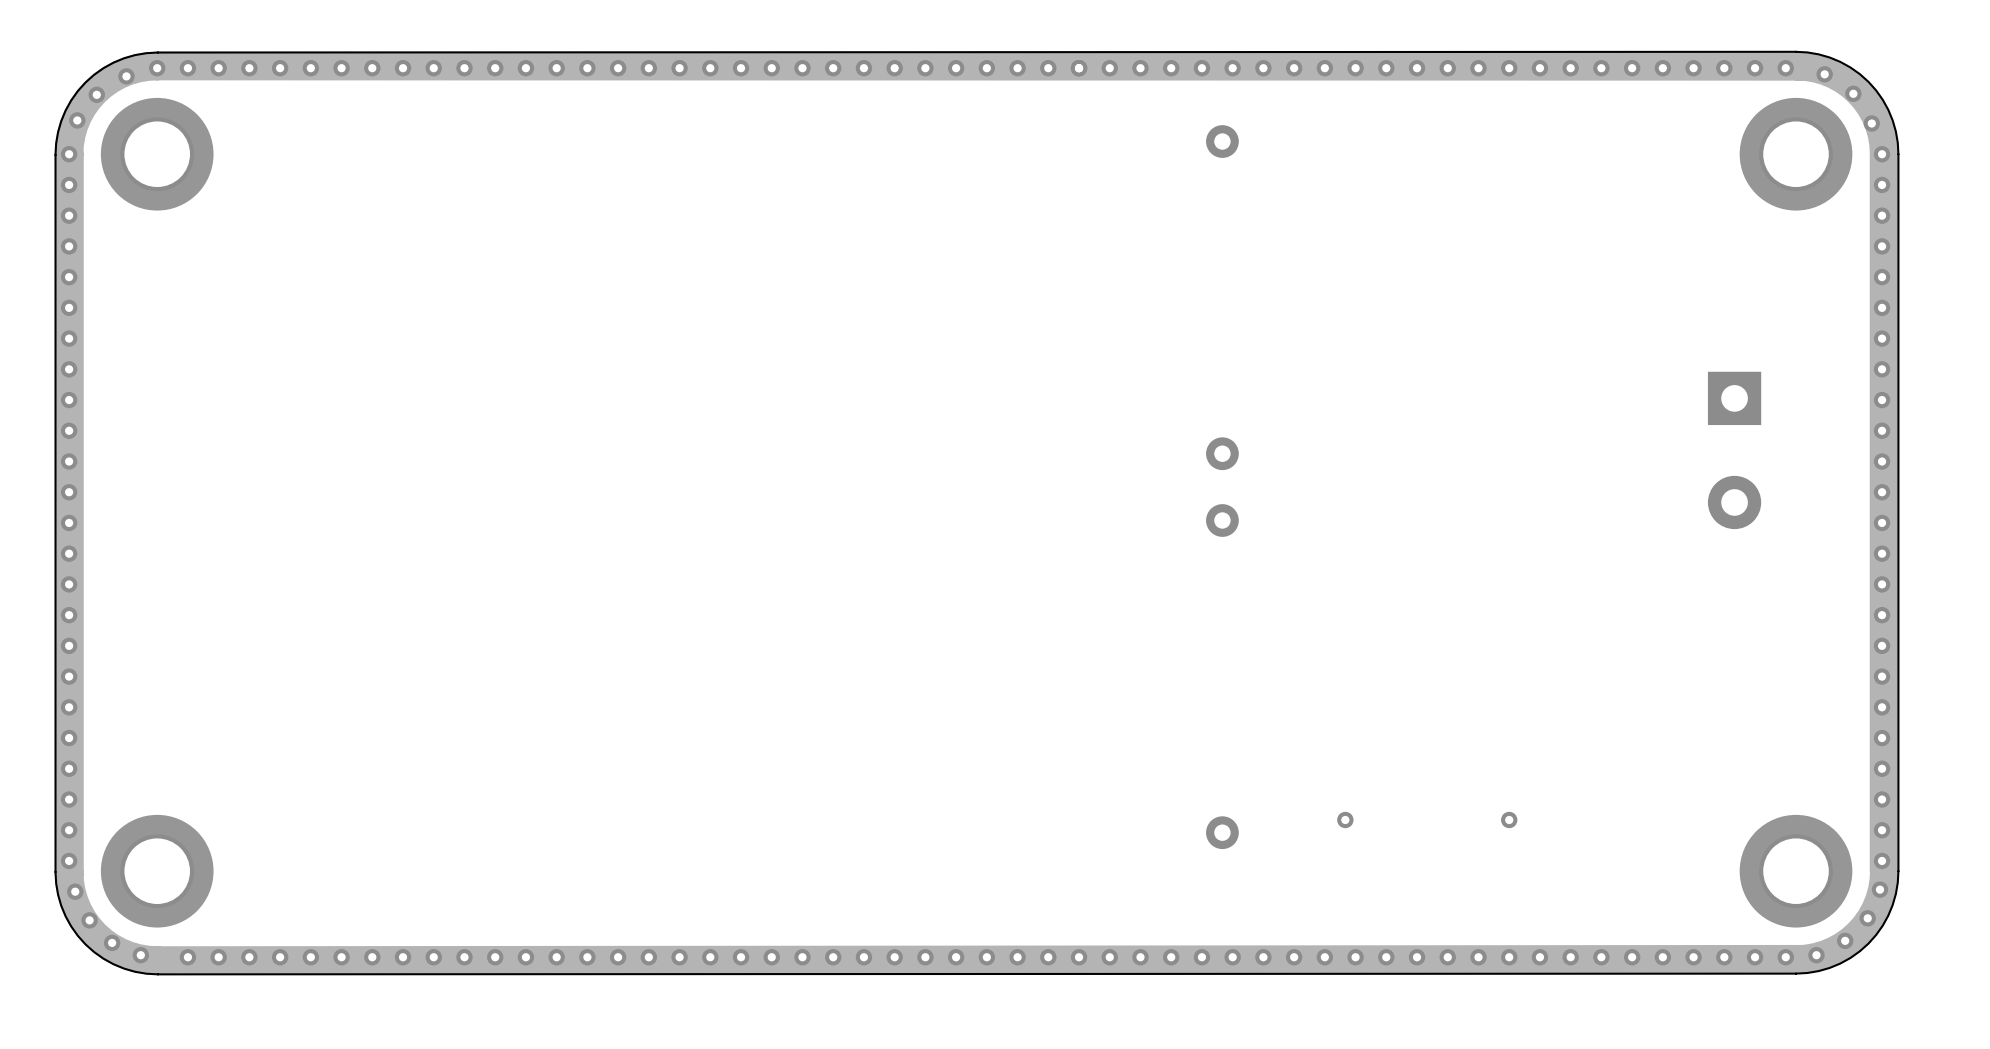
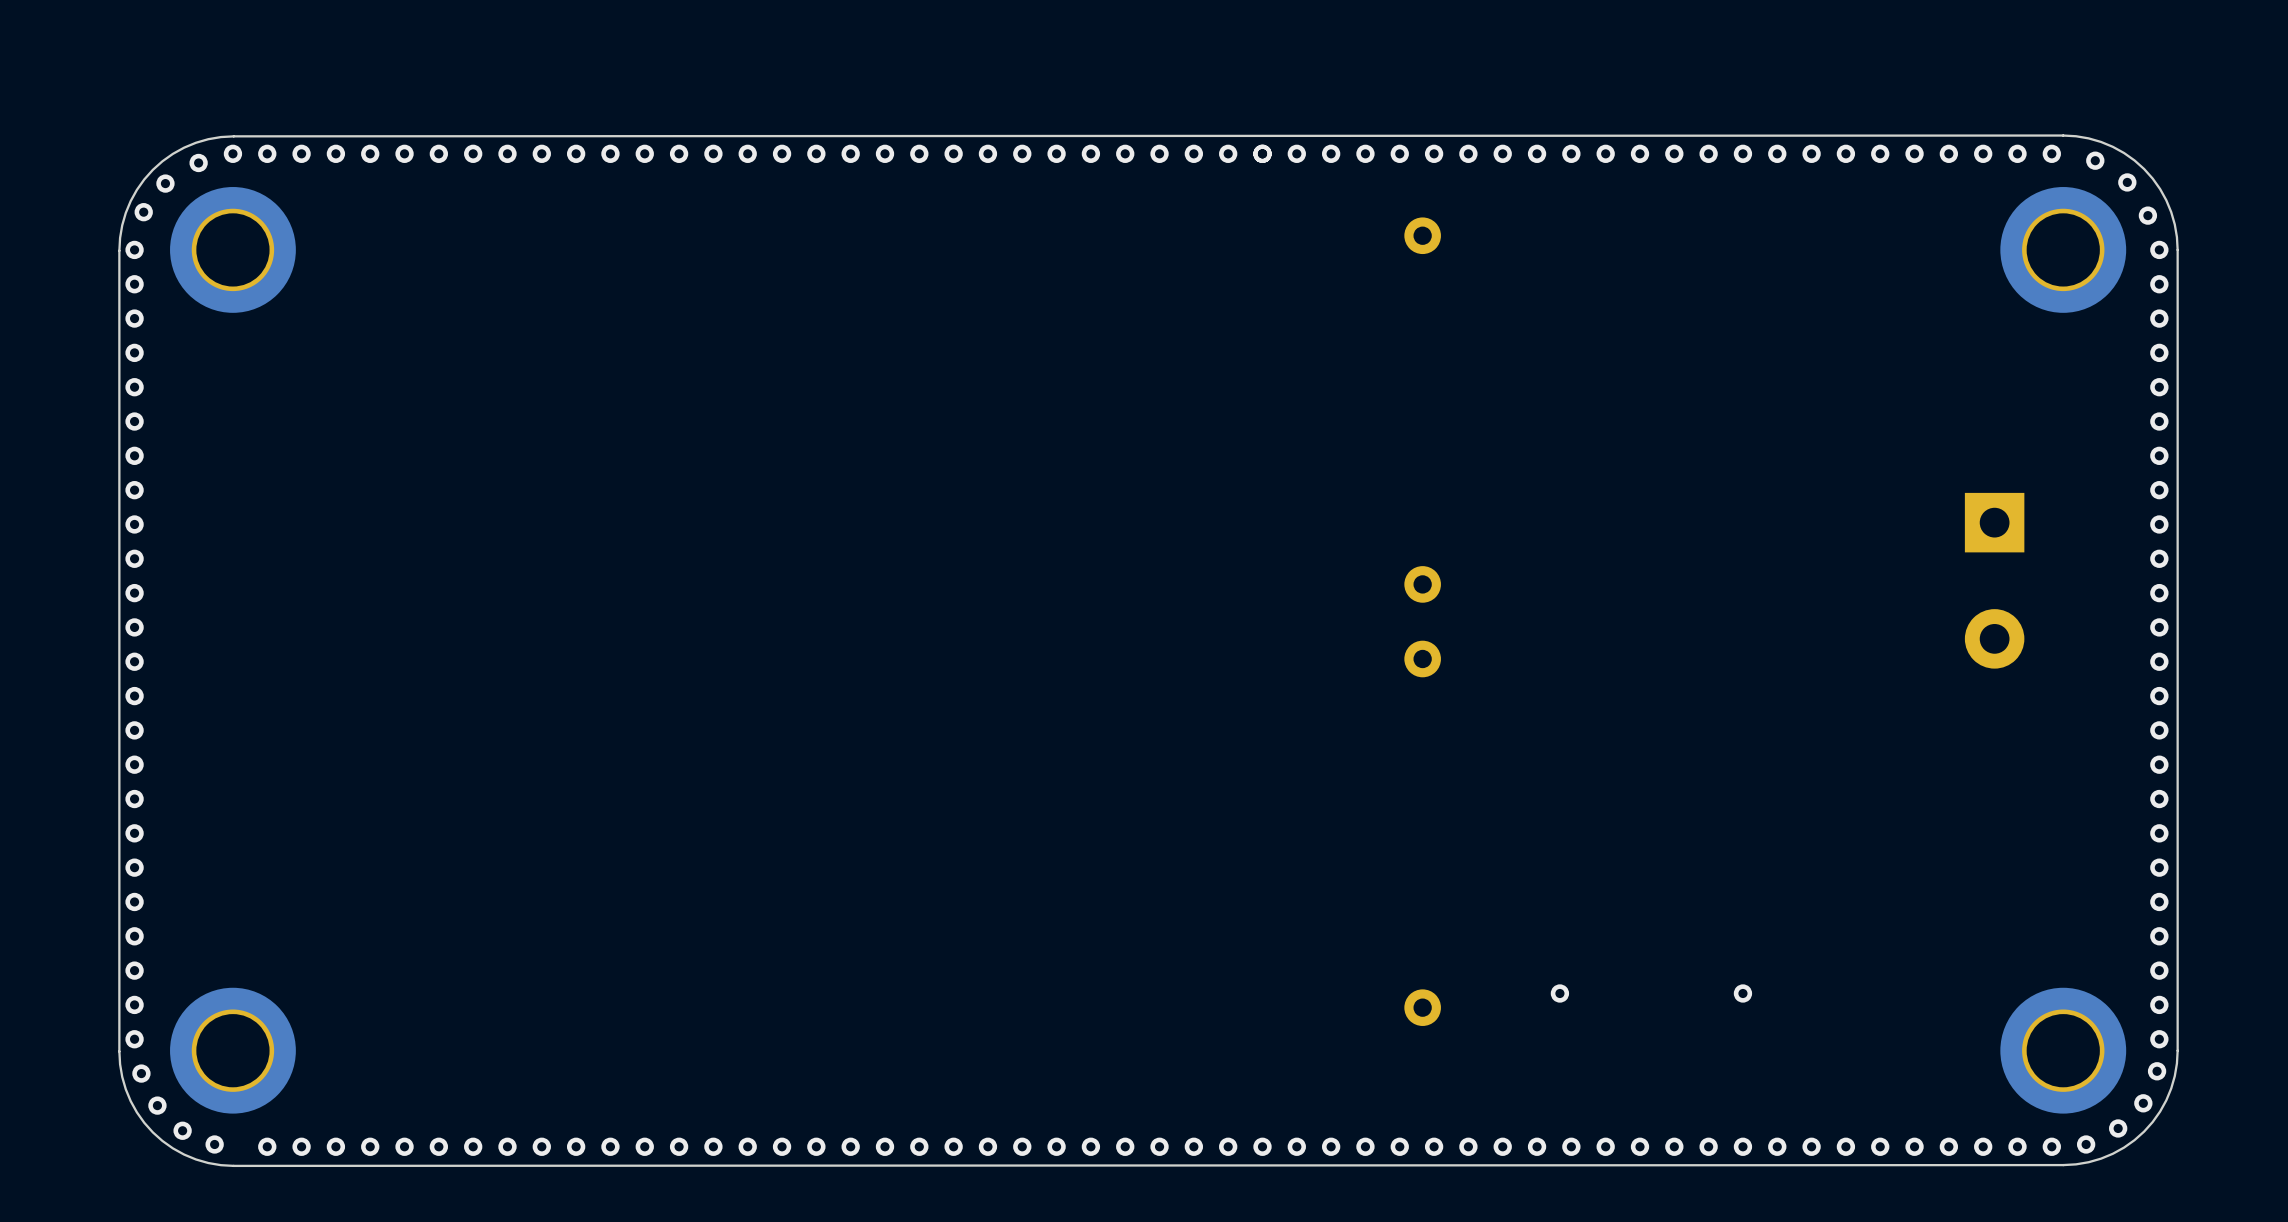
track: (1796, 66) (1825, 70) (1843, 79) (1858, 91) (1875, 115) (1881, 134) (1884, 153) -> none
track: (1800, 66) (157, 66) (128, 70) (110, 79) (94, 91) (77, 115) (71, 134) (69, 154) -> none
track: (1884, 154) (1884, 871) -> none
track: (69, 155) (69, 872) -> none
track: (1884, 871) (1879, 900) (1870, 918) (1858, 933) (1843, 946) (1825, 954) (1796, 959) -> none
track: (69, 872) (74, 901) (82, 919) (95, 934) (110, 947) (128, 955) (157, 960) (1796, 959) -> none

